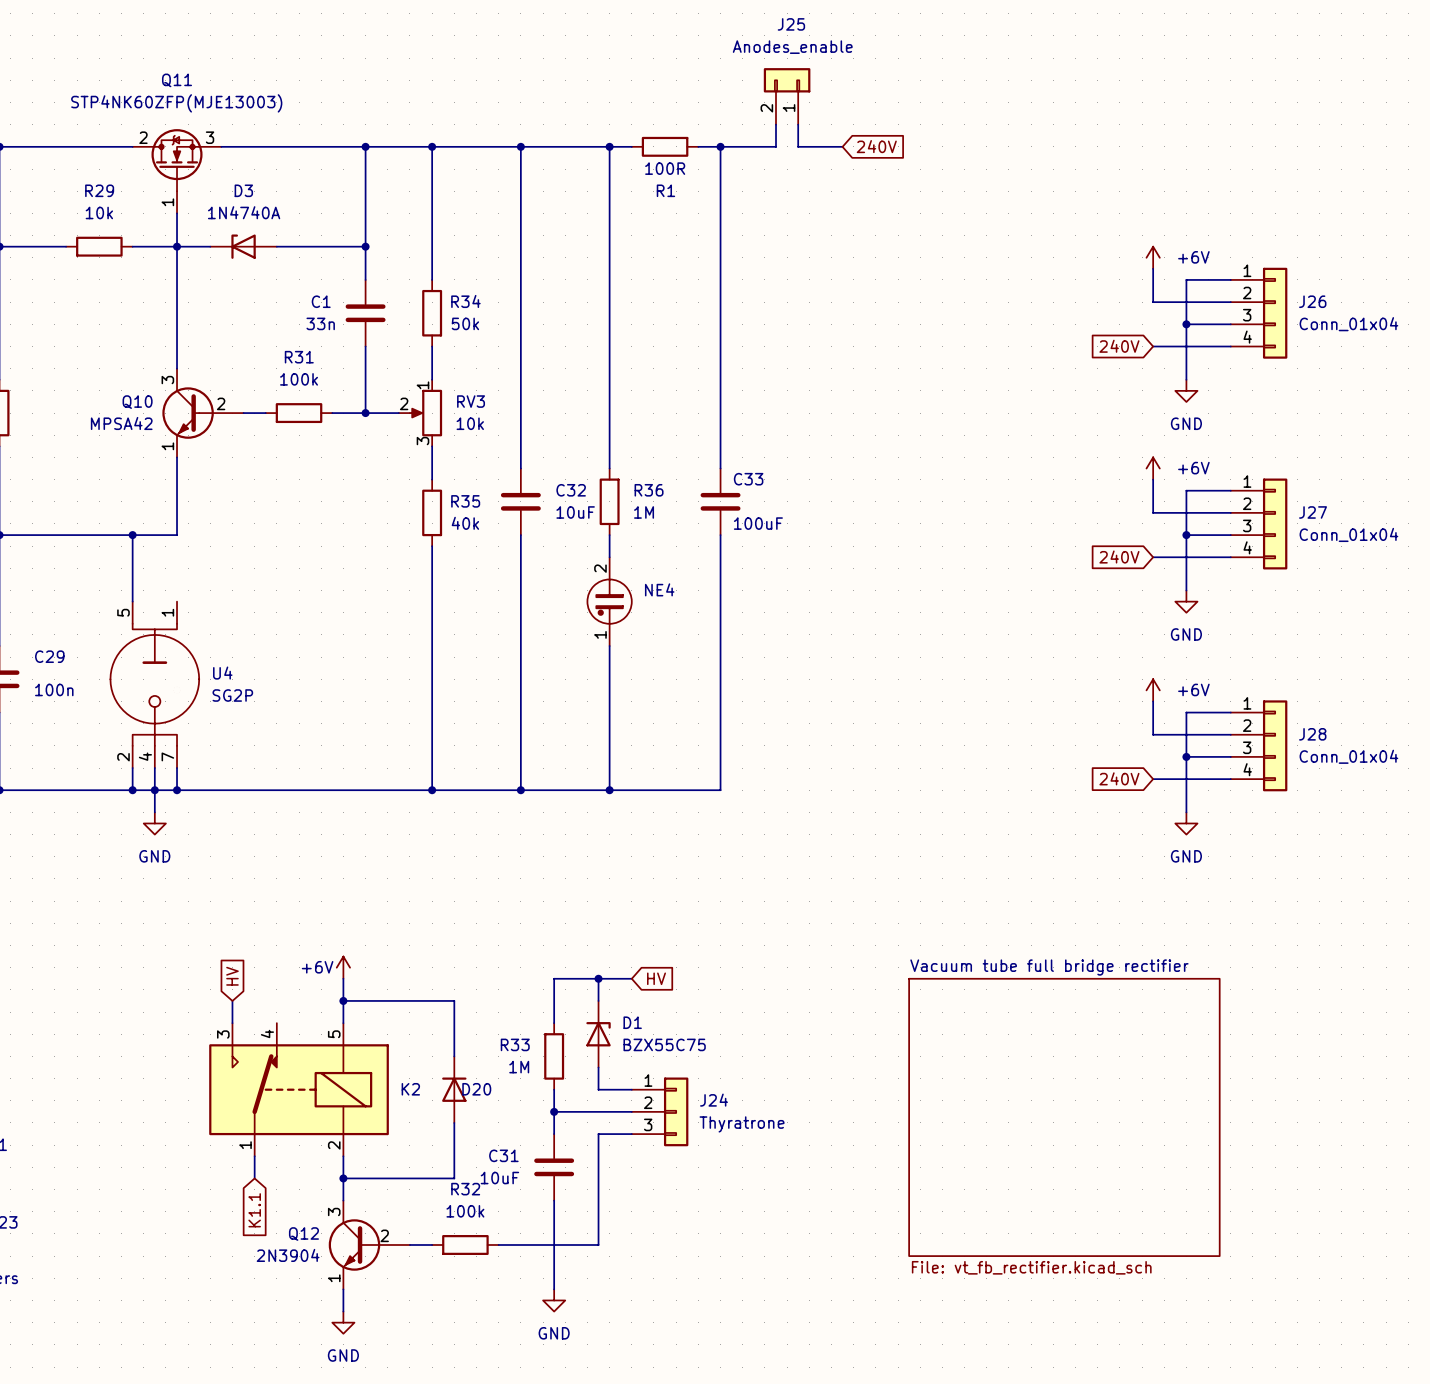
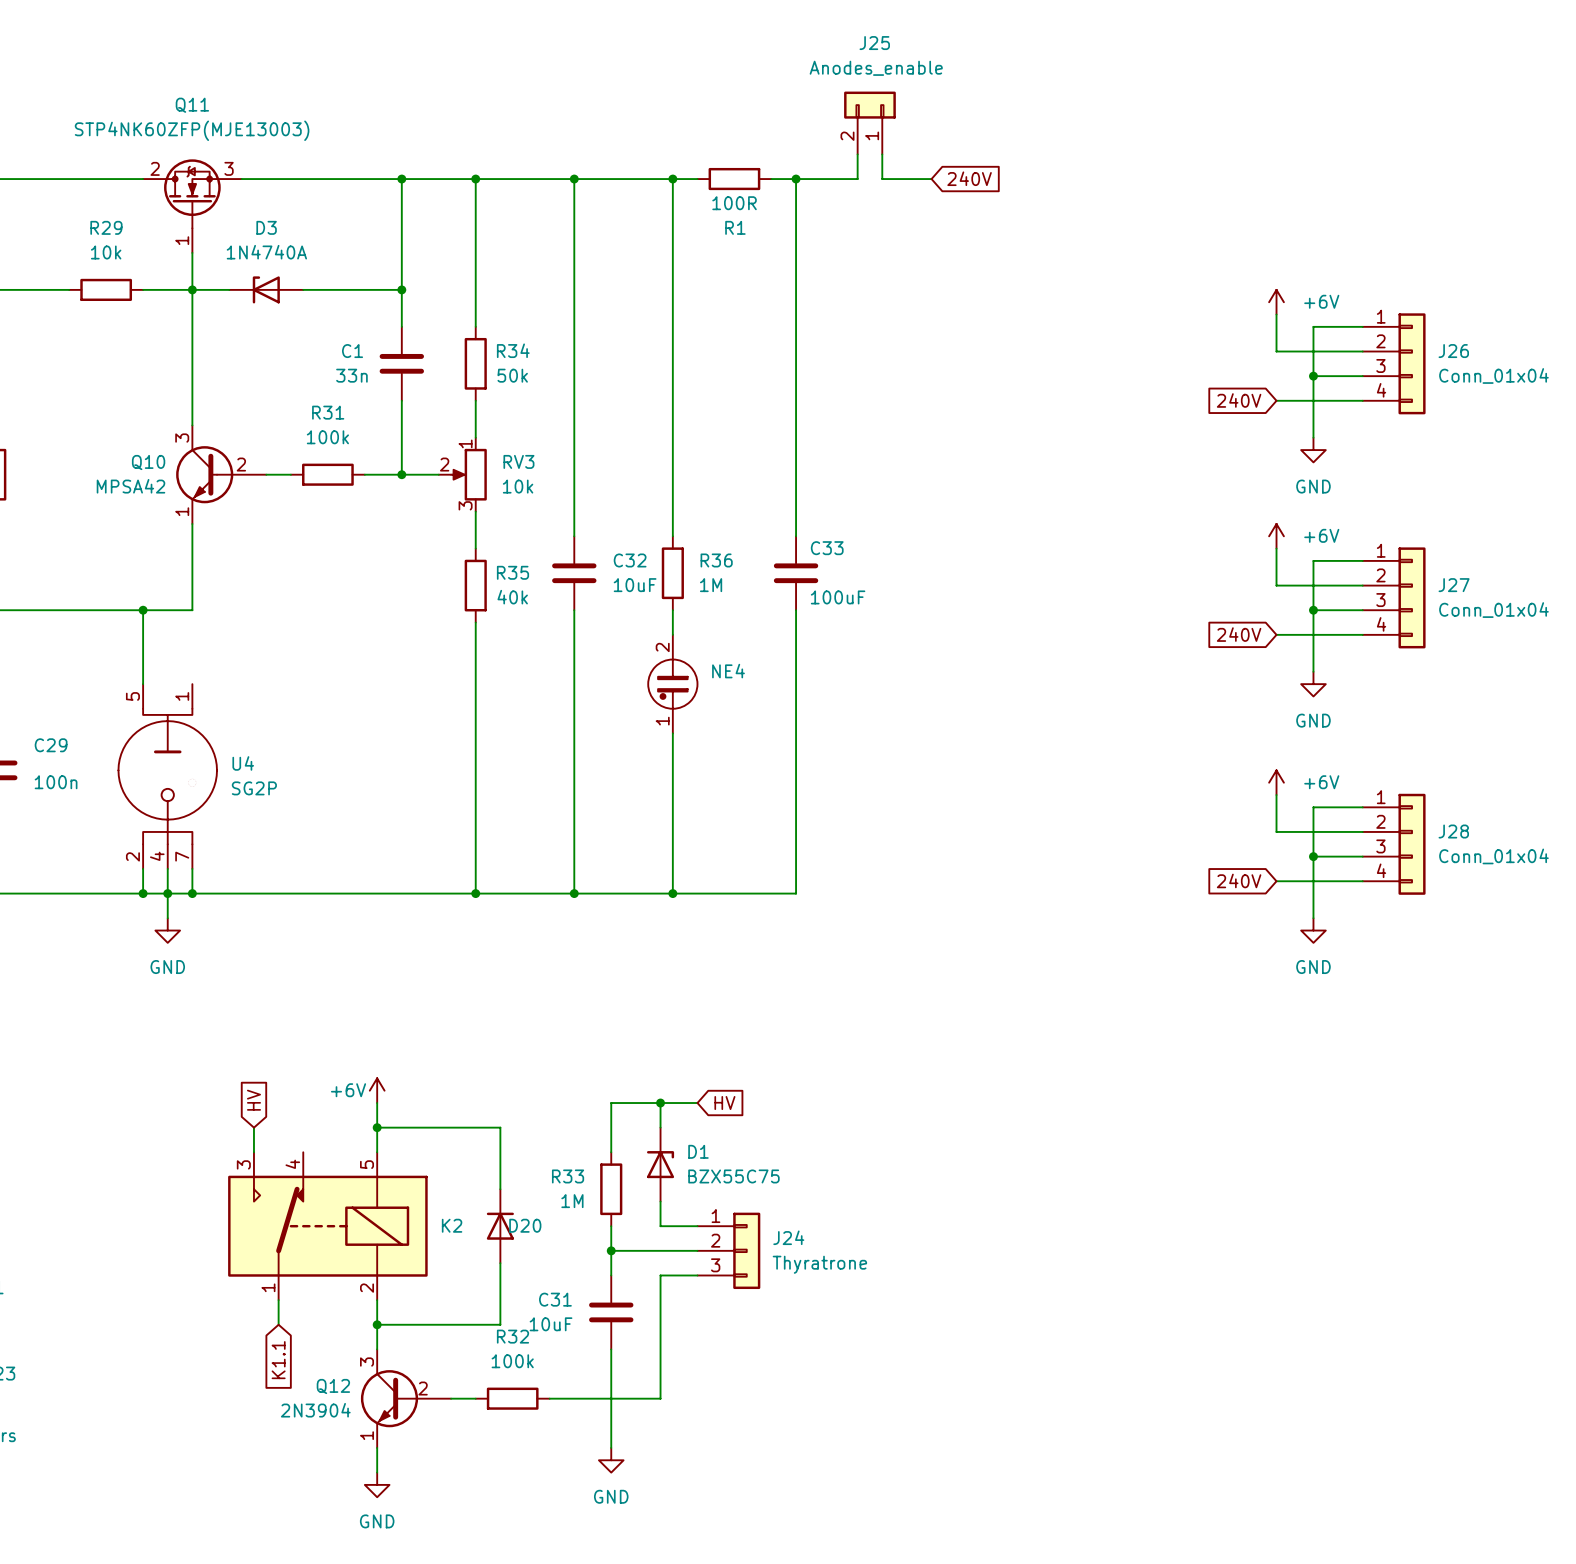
sheet Vacuum tube full bridge rectifier: File: vt_fb_rectifier.kicad_sch (1064, 1117) -> none

